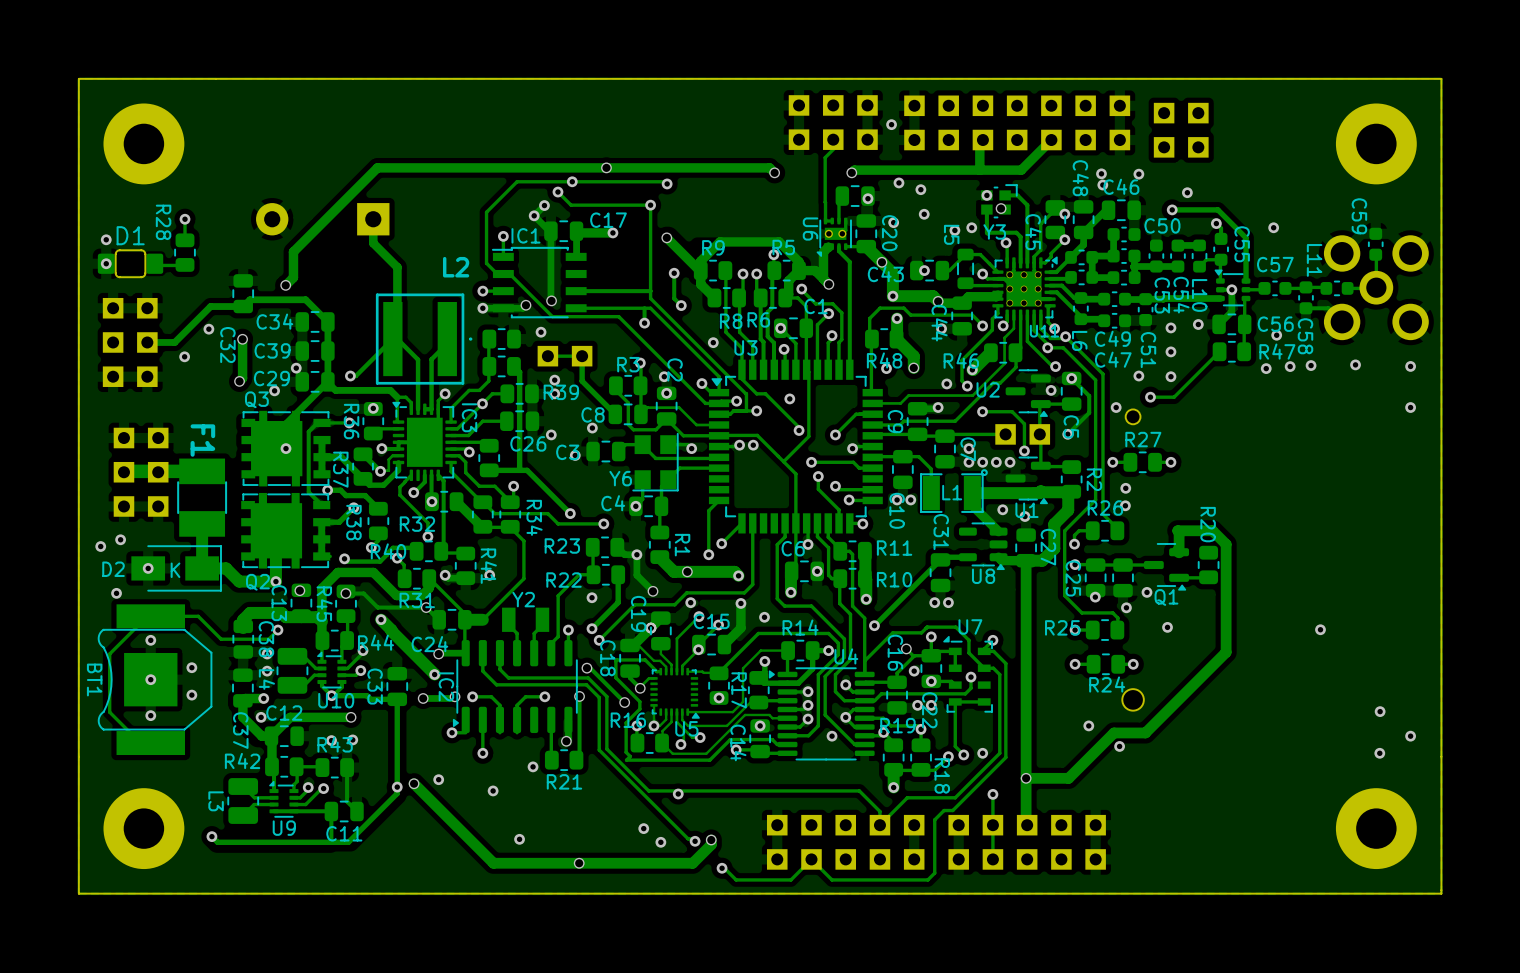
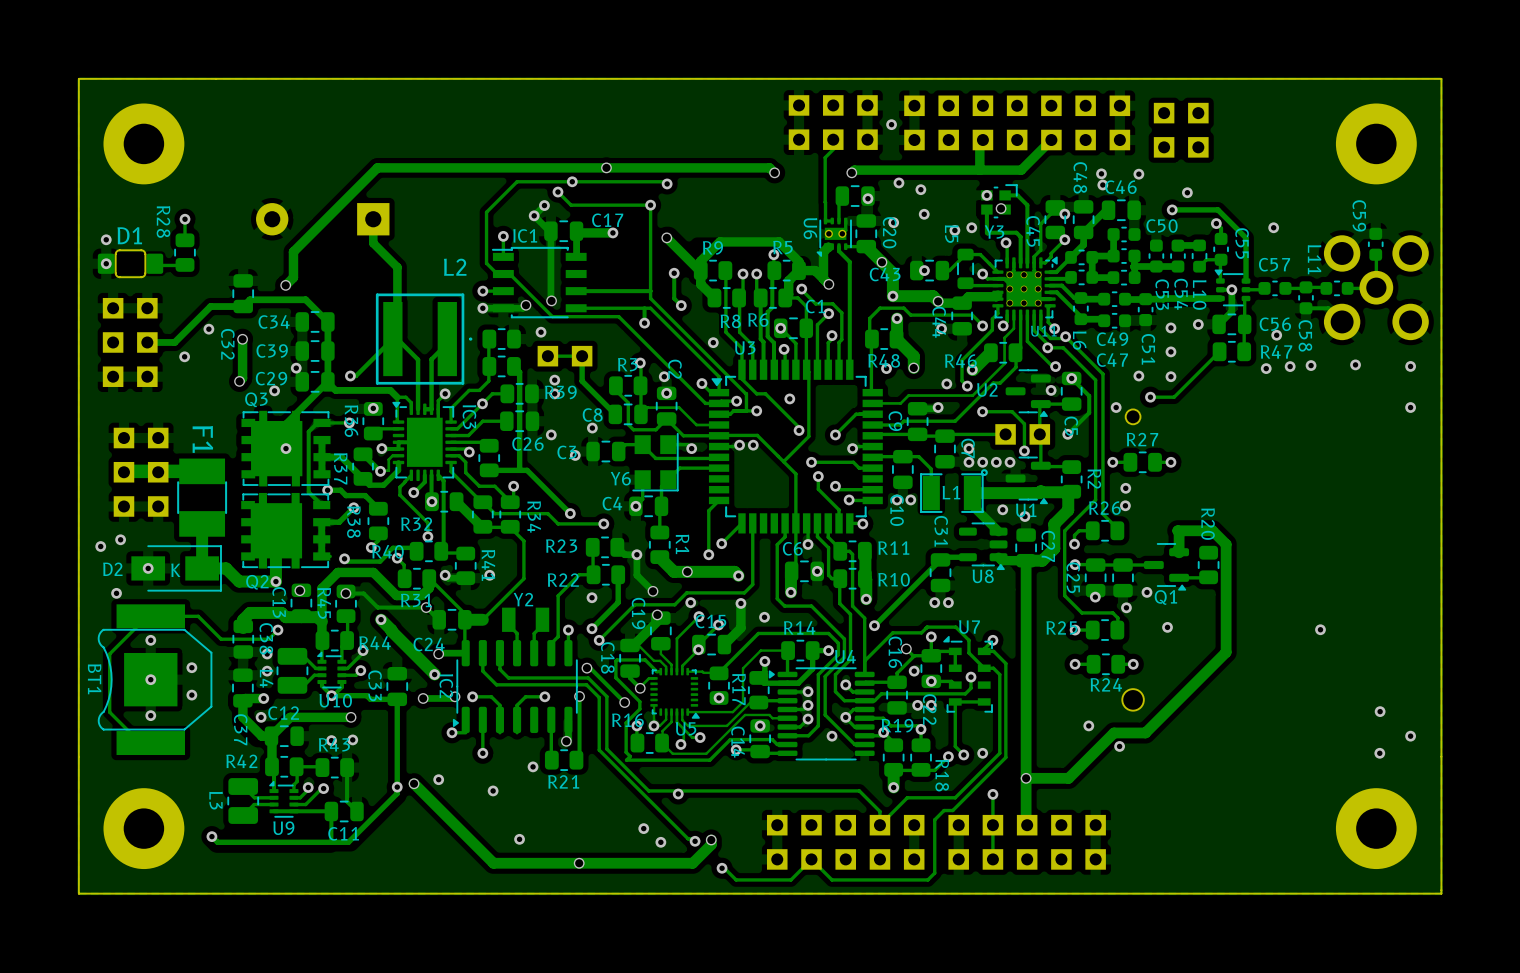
via: none -> (657, 614)
via: (650, 628) -> none

